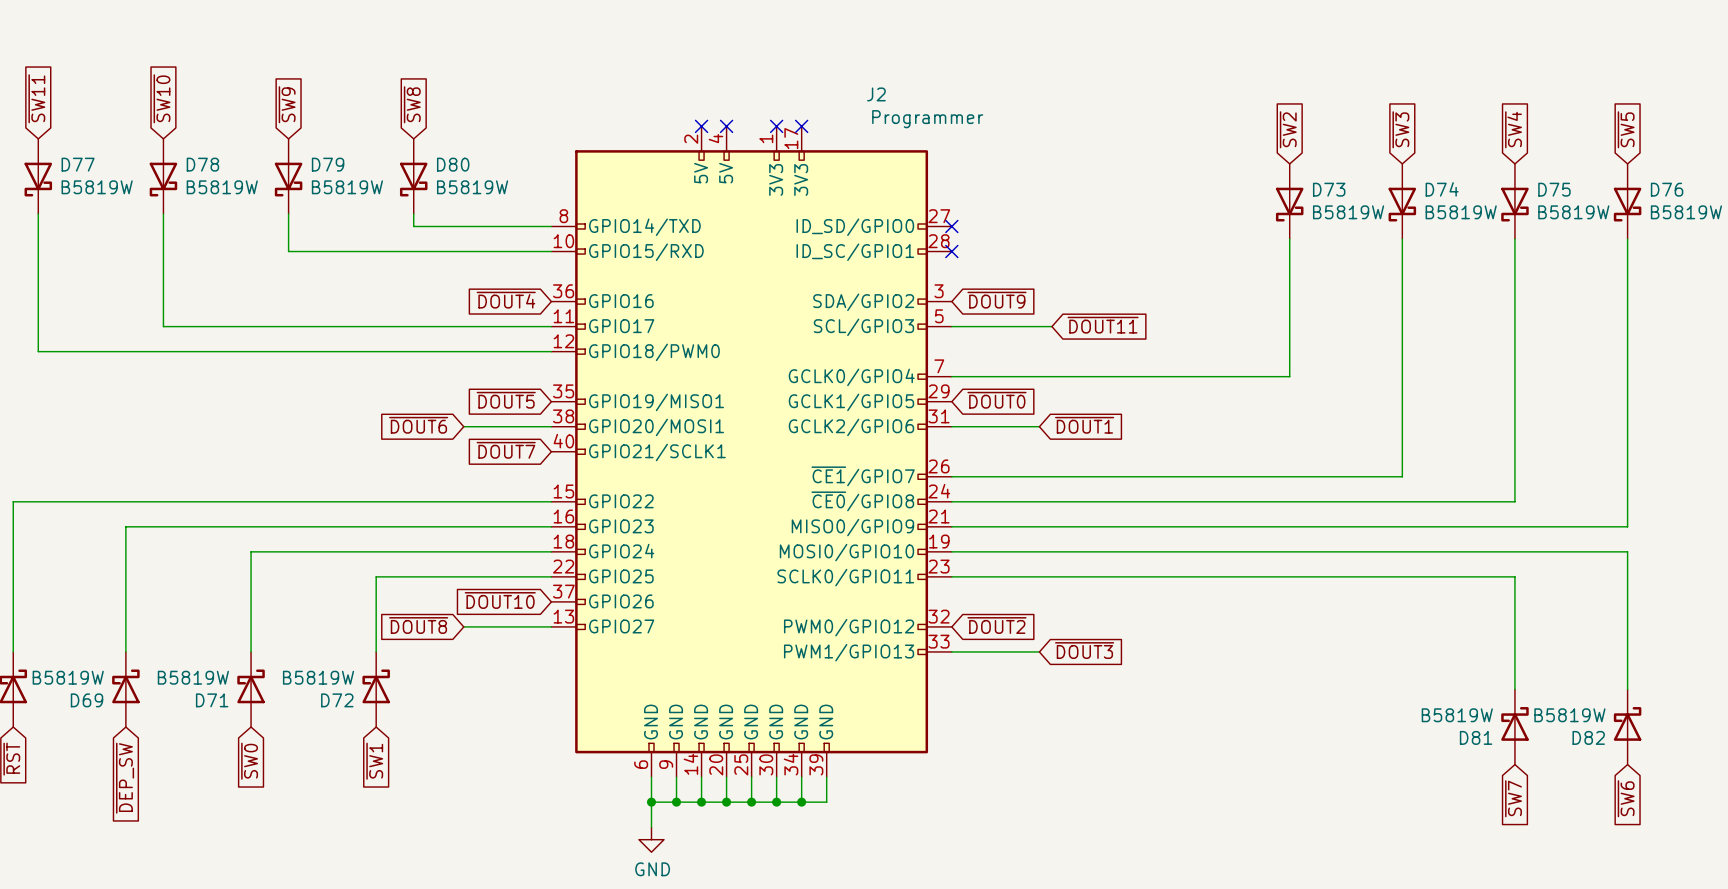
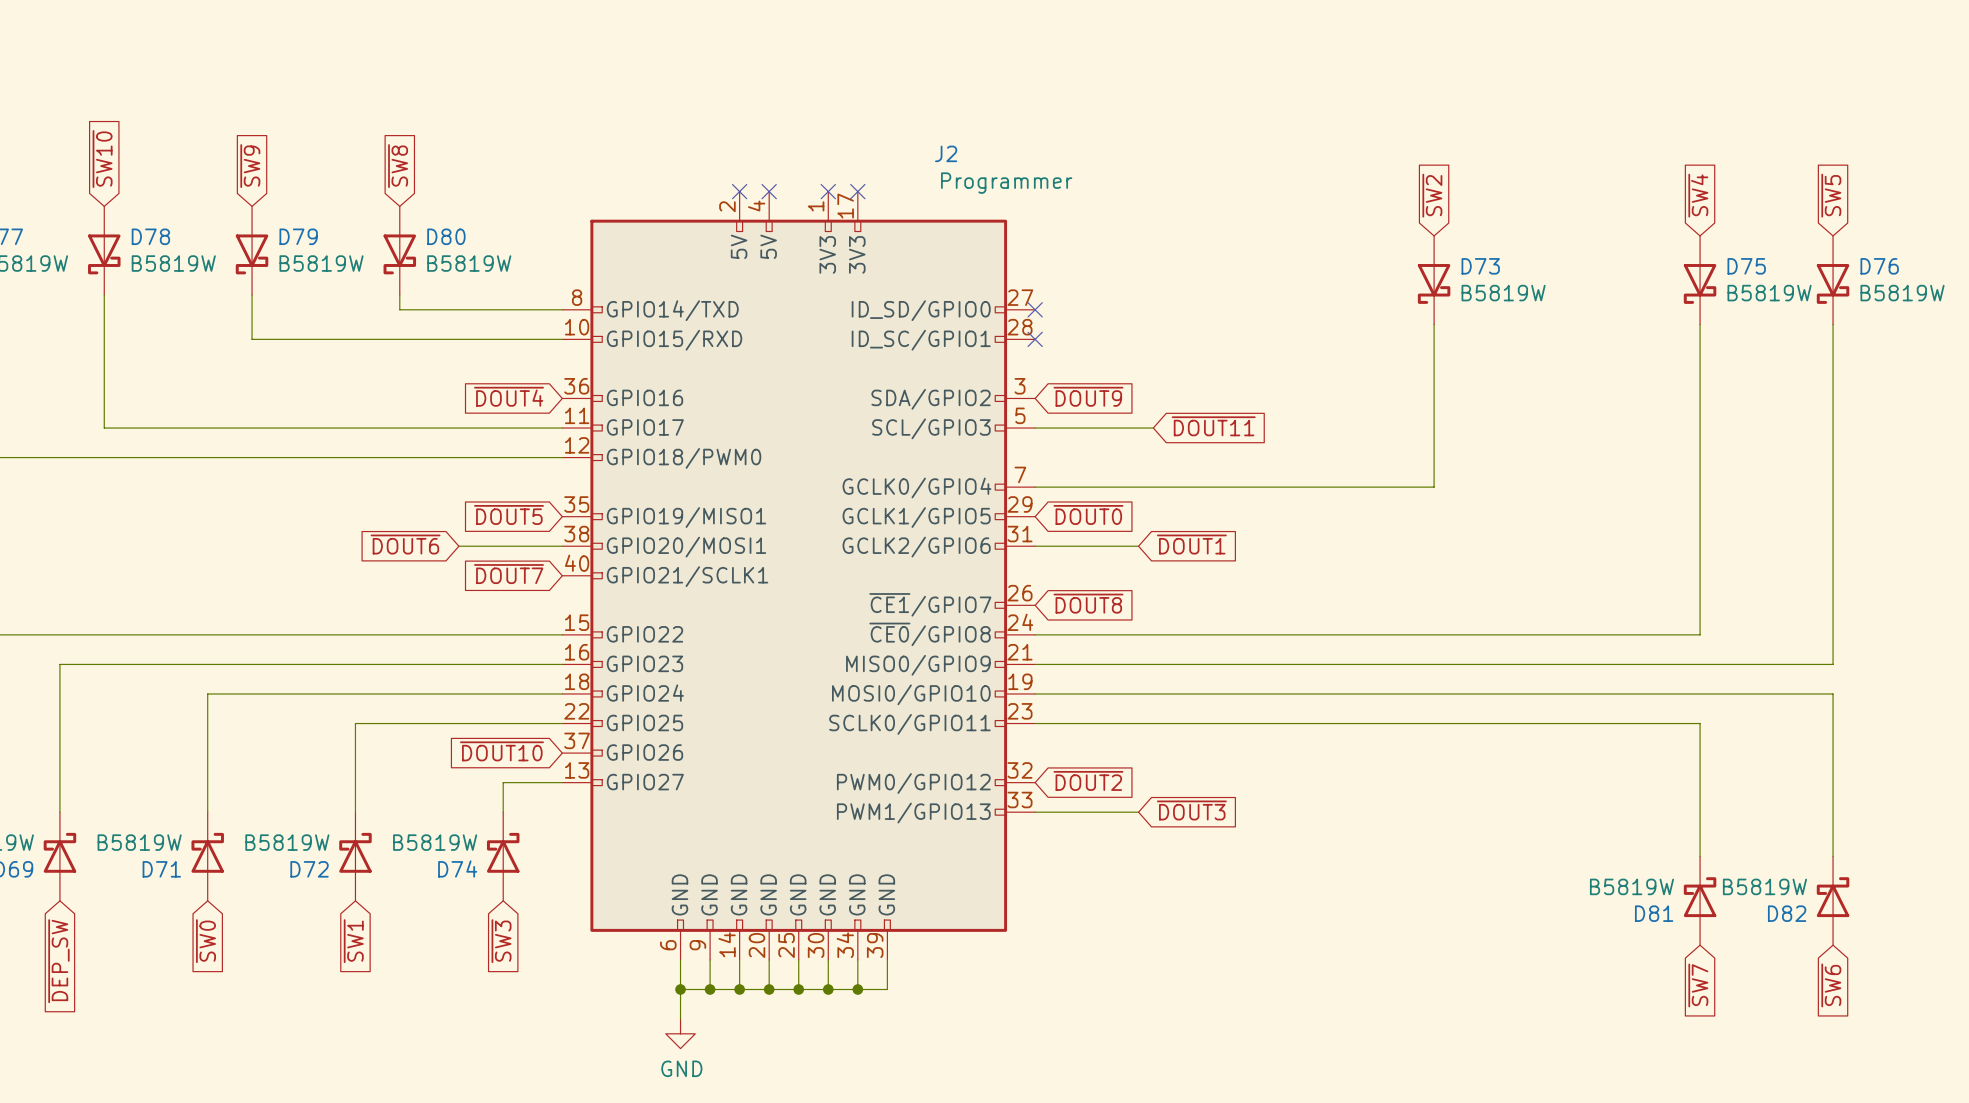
global label: ~{SW3} (1400, 129) -> none
D74 position: (1402, 201) -> (503, 856)
D74 rotation: 0° (1402, 204) -> 180° (503, 852)
wire: (1402, 239) (1402, 476) (951, 476) -> none
global label: none -> ~{DOUT8} (1088, 603)
global label: ~{DOUT8} (418, 625) -> none
wire: (463, 626) (501, 626) -> (503, 812) (503, 782)
global label: none -> ~{SW3} (501, 941)

